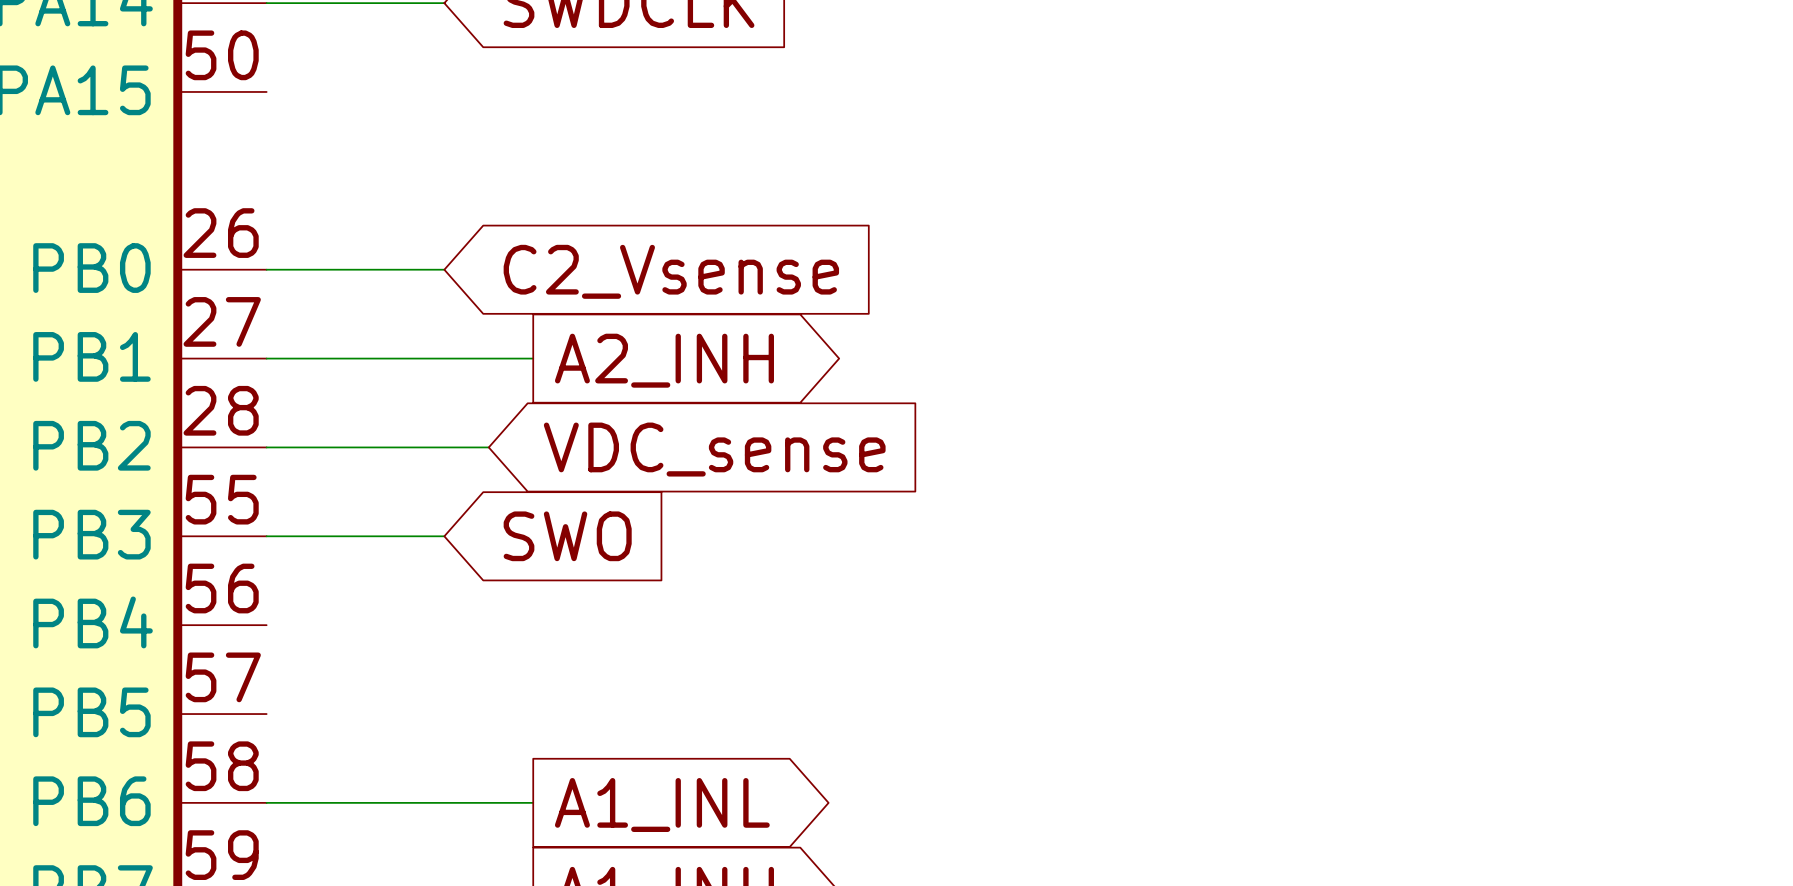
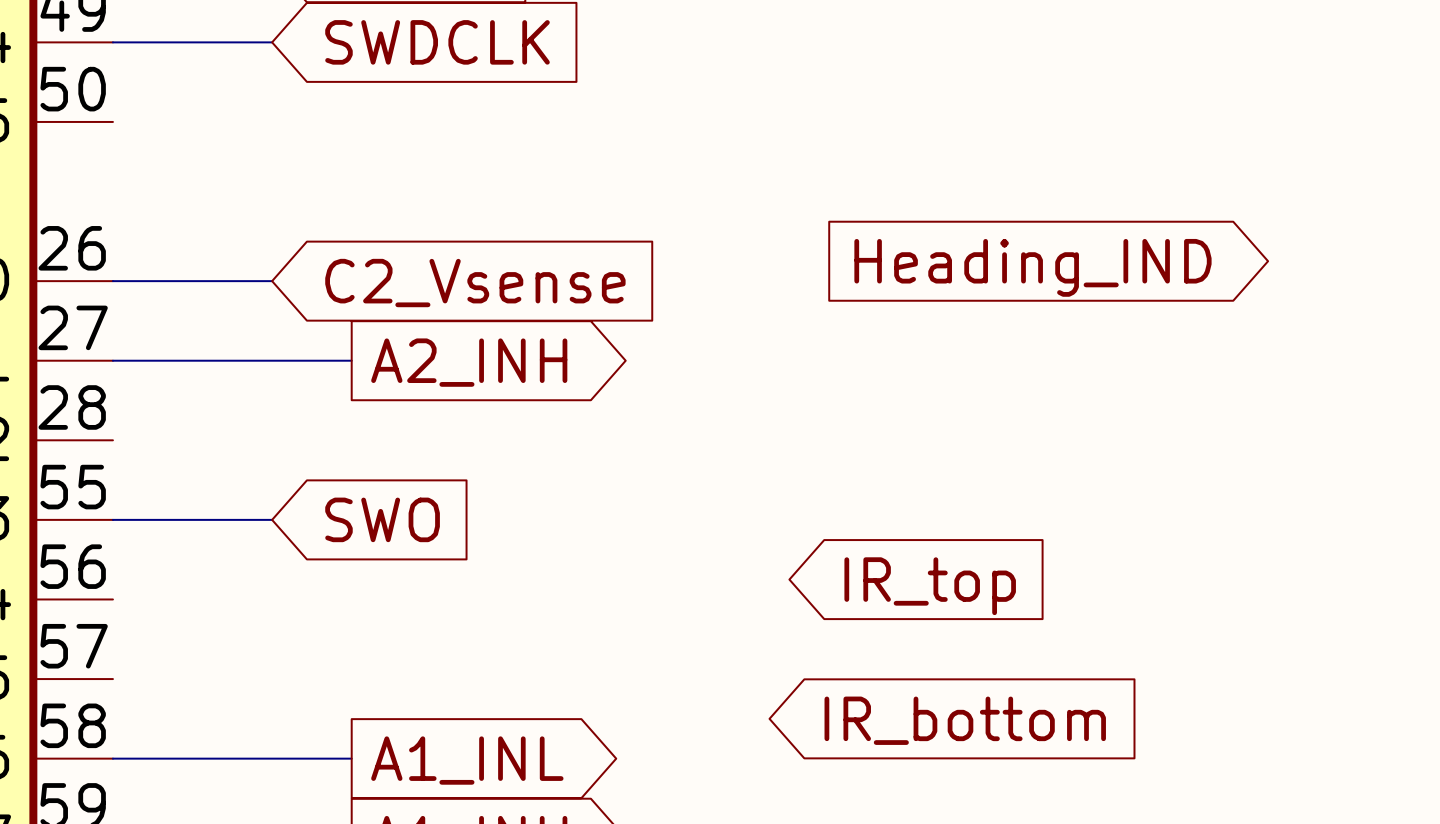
global label: none -> Heading_IND (1032, 267)
wire: (266, 447) (488, 447) -> none
global label: VDC_sense (714, 449) -> none
global label: none -> IR_top (930, 586)
global label: none -> IR_bottom (965, 720)

